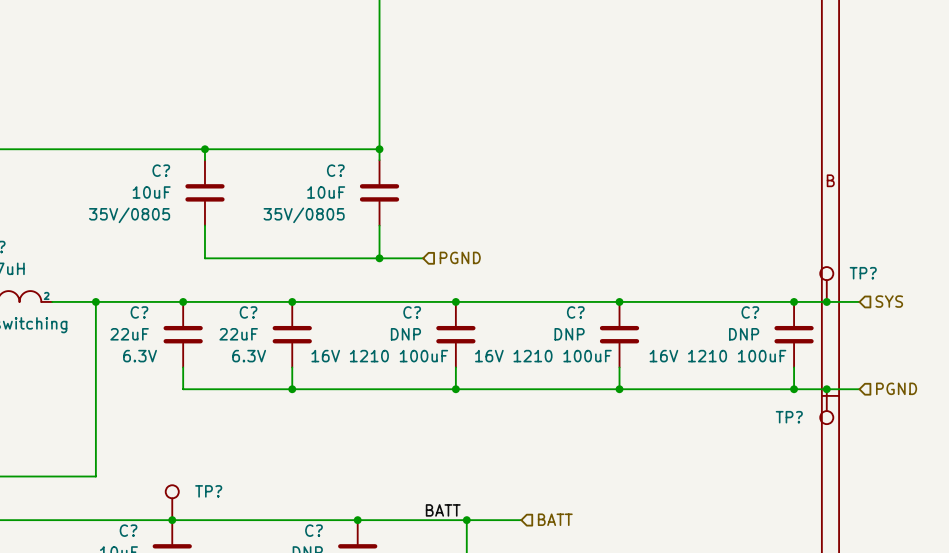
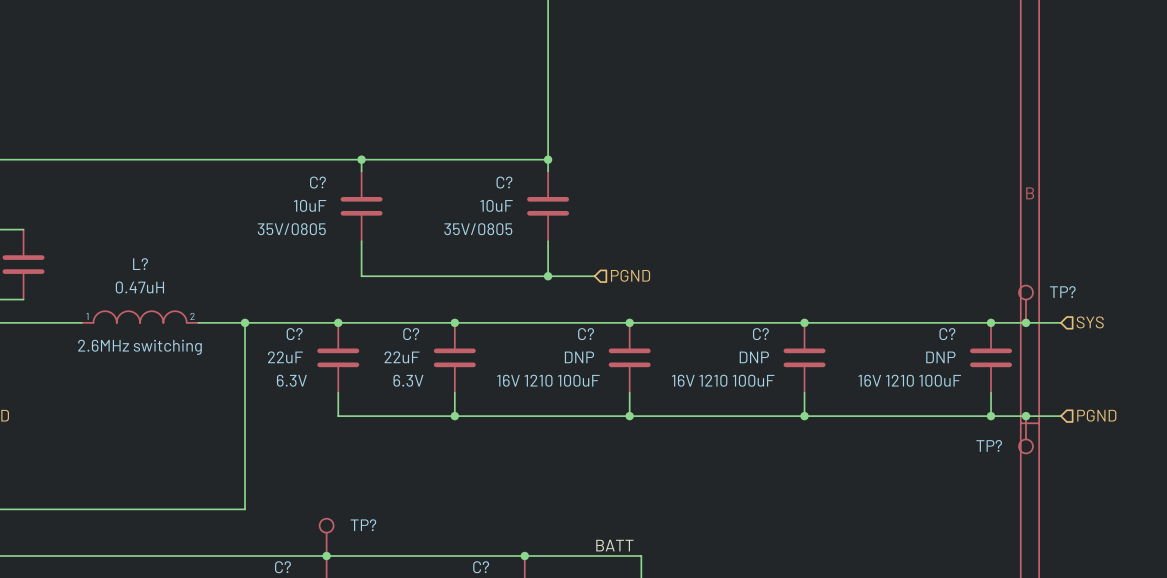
hierarchical label: BATT (555, 519) -> none
wire: (466, 520) (521, 520) -> none
junction: (466, 520) -> none

